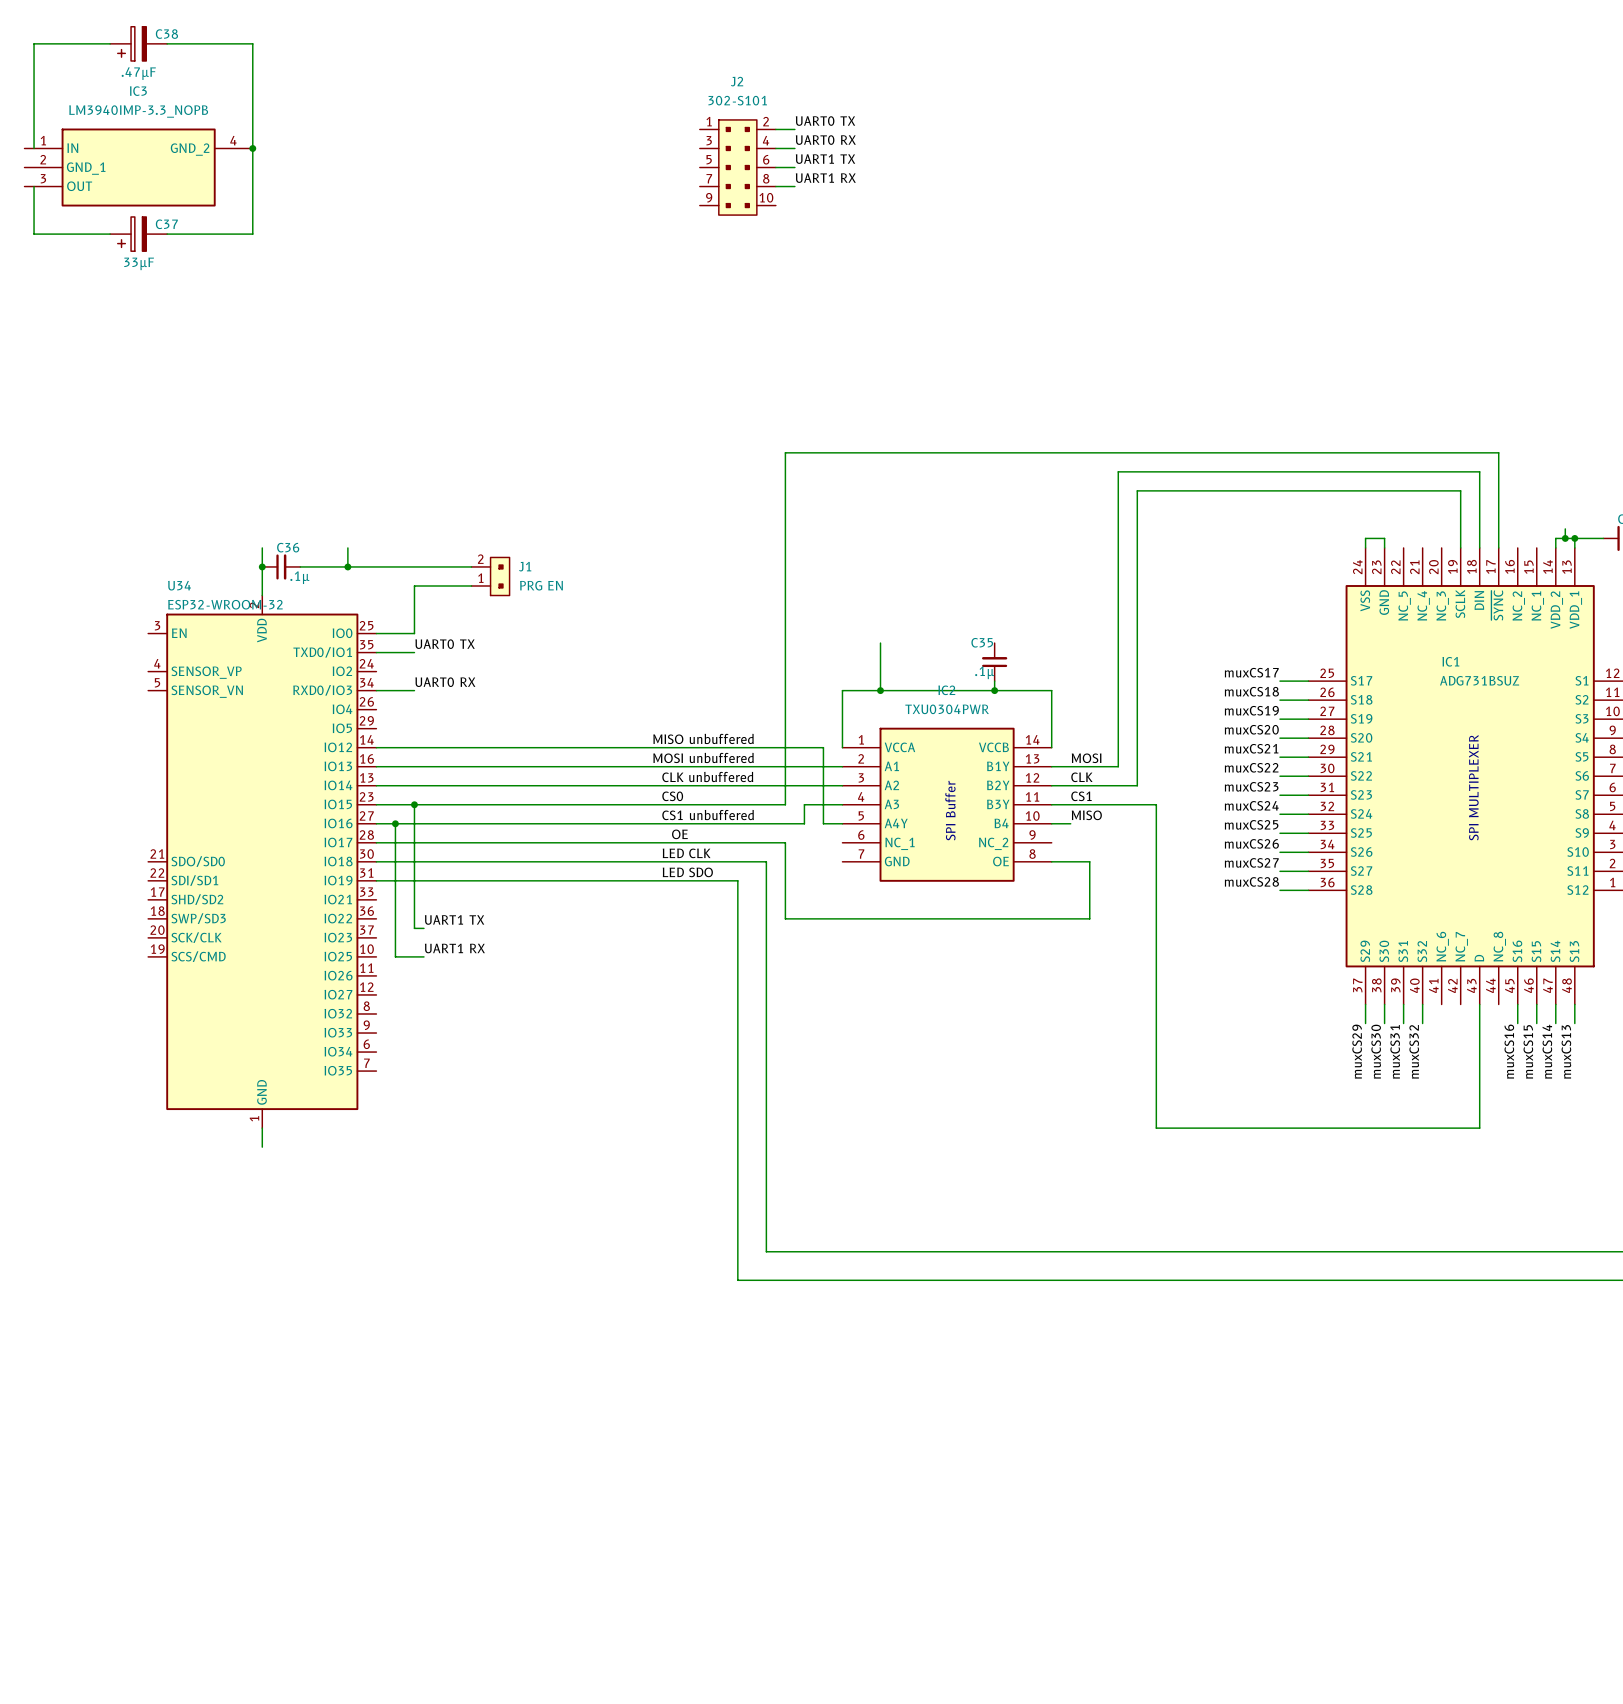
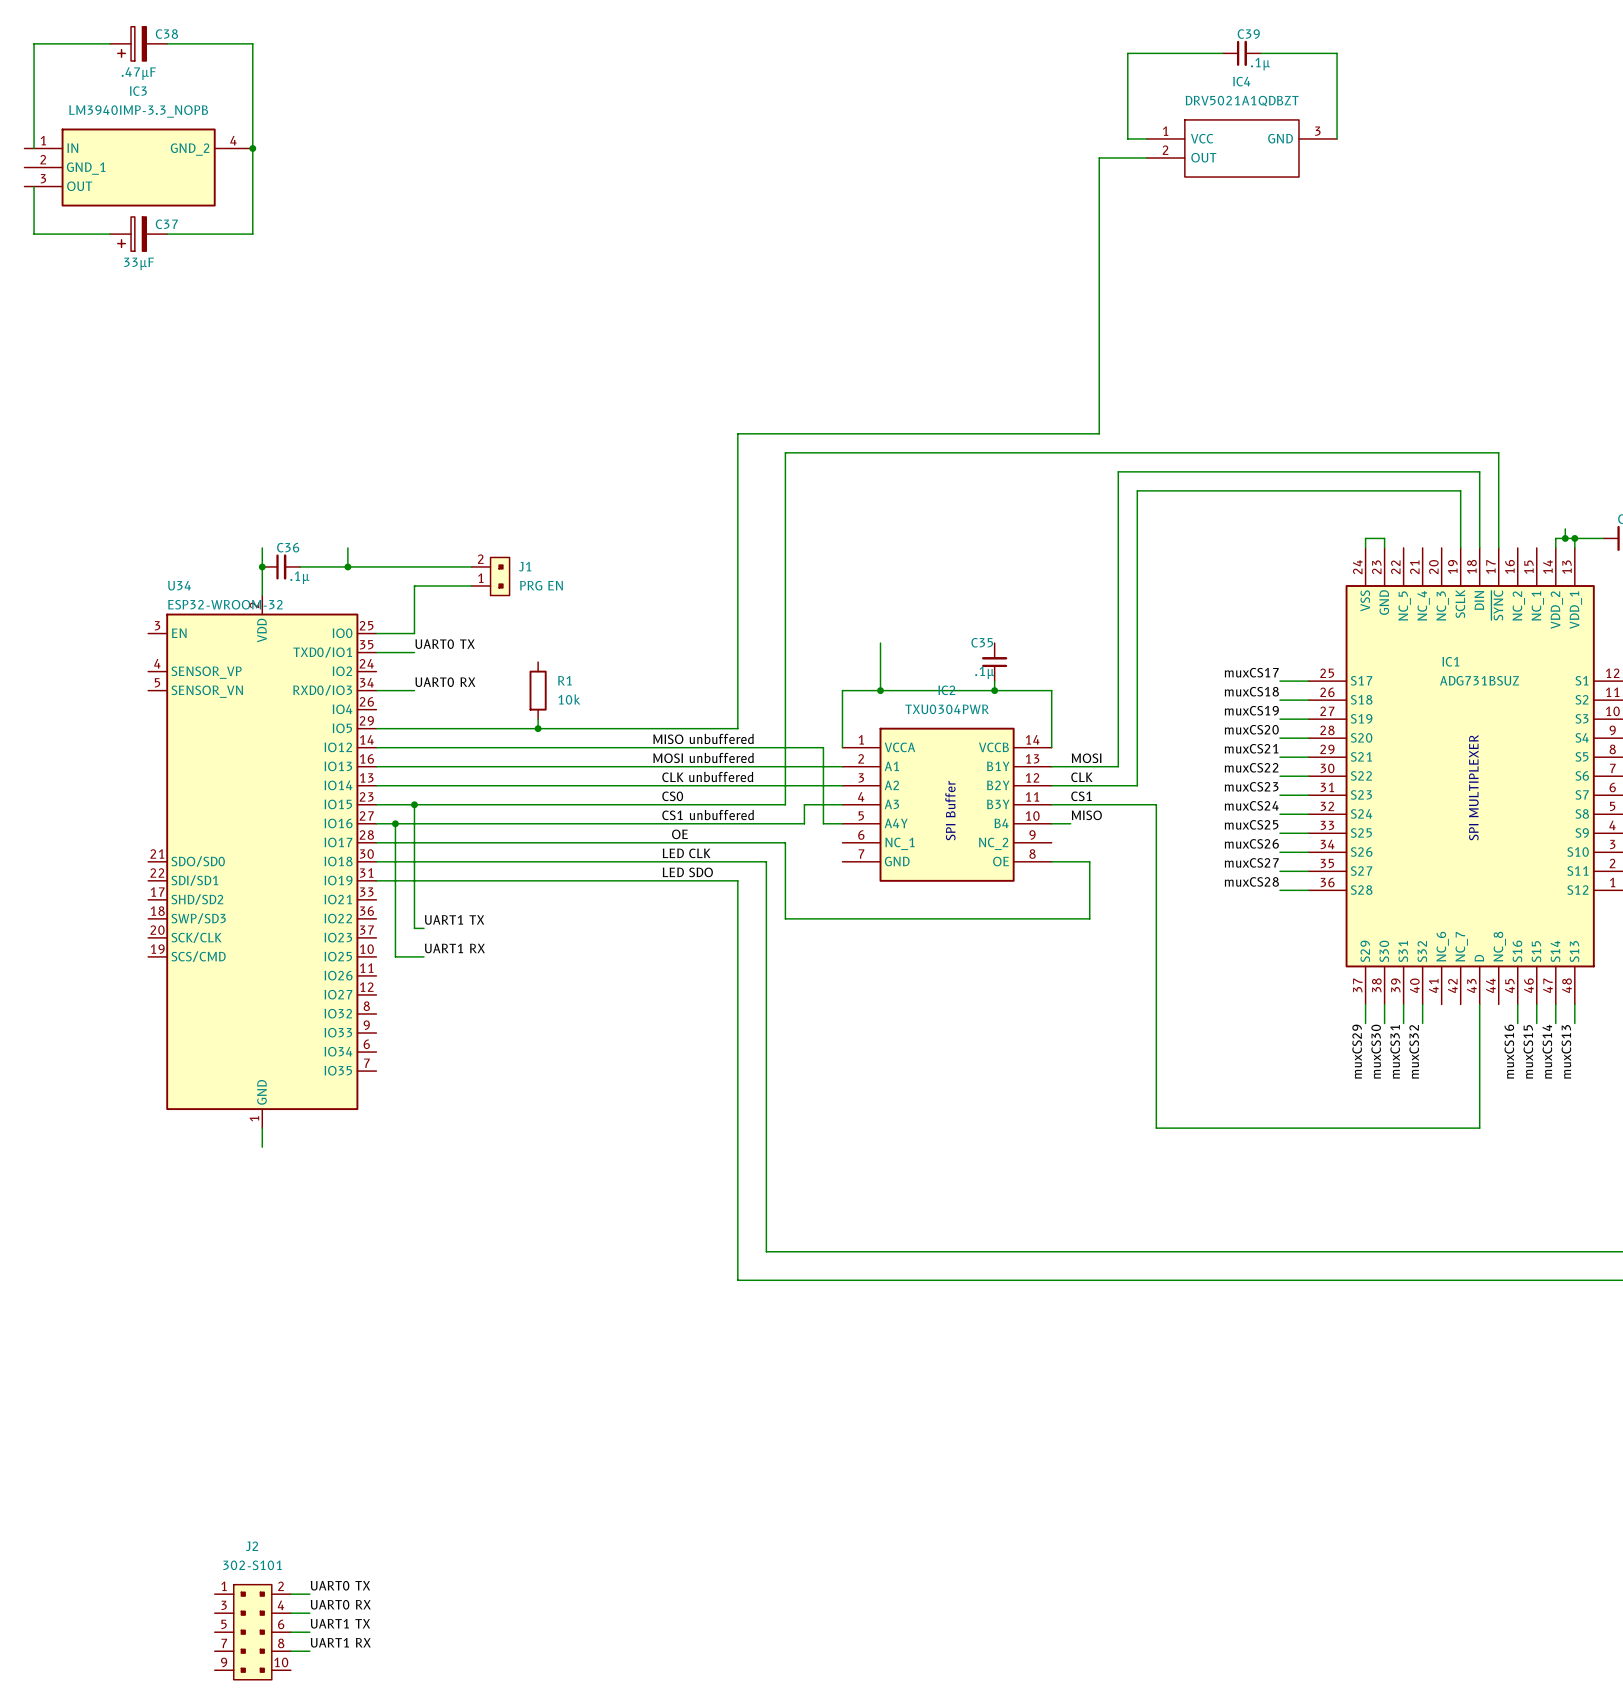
wire: none -> (1222, 53) (1127, 53) (1127, 138) (1146, 138)
C39: none -> .1µ (1241, 53)
wire: none -> (1260, 53) (1337, 53) (1337, 138)
label: UART0 TX (825, 121) -> none
wire: (775, 129) (794, 129) -> none
label: UART0 RX (825, 140) -> none
wire: (775, 148) (794, 148) -> none
IC4: none -> DRV5021A1QDBZT (1241, 148)
wire: none -> (1146, 158) (1099, 158) (1099, 433) (737, 433) (737, 728) (376, 728)
label: UART1 TX (825, 159) -> none
J2 position: (737, 167) -> (252, 1632)
wire: (775, 167) (794, 167) -> none
label: UART1 RX (825, 178) -> none
wire: (775, 186) (794, 186) -> none
R1: none -> 10k (538, 690)
wire: none -> (538, 719) (538, 728)
junction: none -> (538, 728)
label: none -> UART0 TX (340, 1585)
wire: none -> (290, 1594) (309, 1594)
label: none -> UART0 RX (340, 1604)
wire: none -> (290, 1613) (309, 1613)
label: none -> UART1 TX (340, 1623)
wire: none -> (290, 1632) (309, 1632)
label: none -> UART1 RX (340, 1642)
wire: none -> (290, 1651) (309, 1651)

